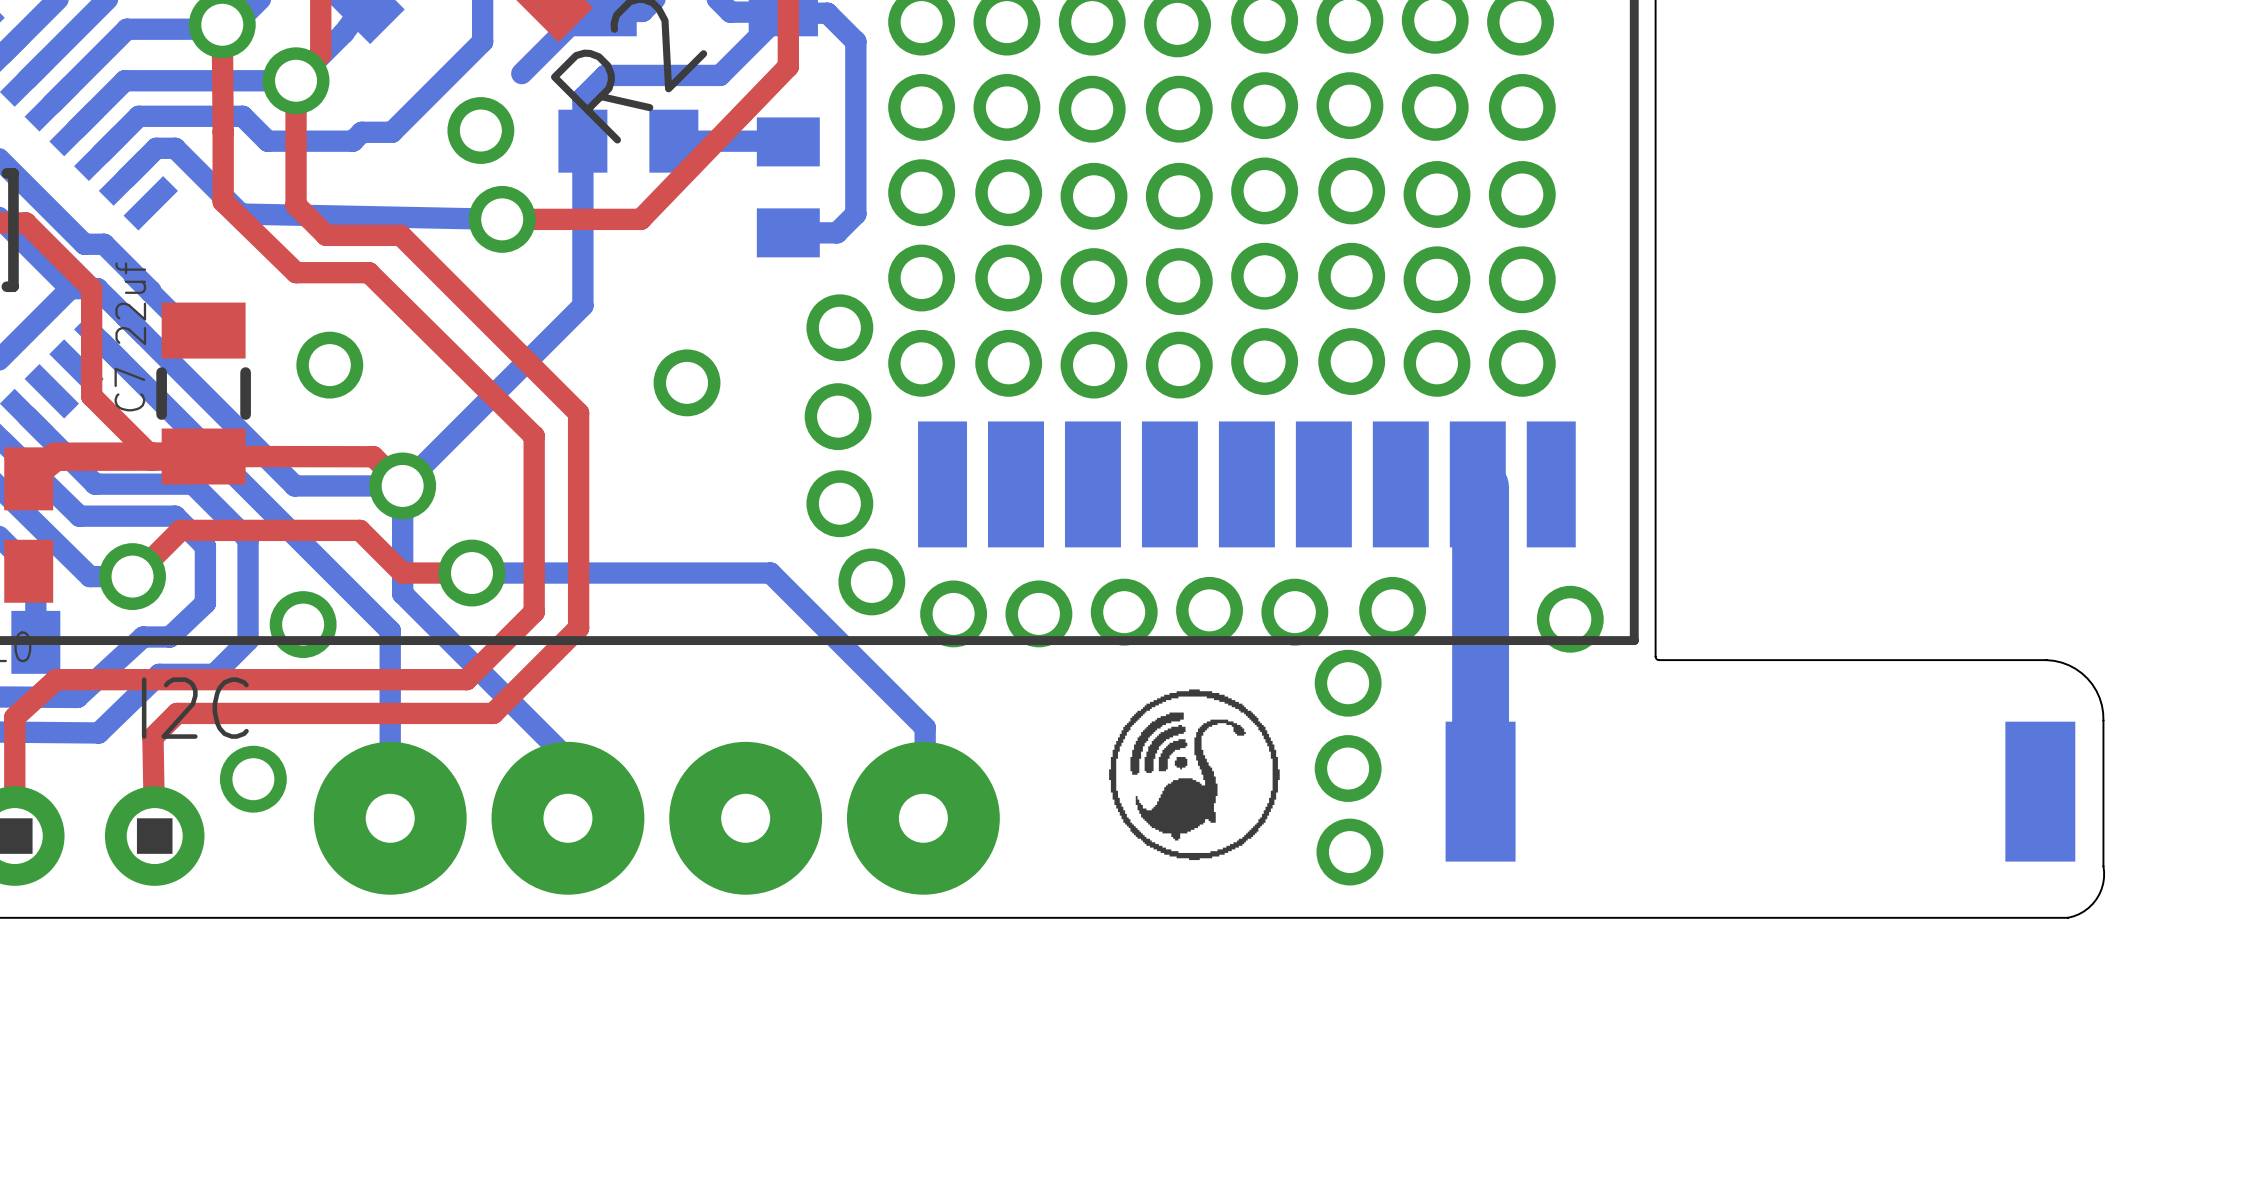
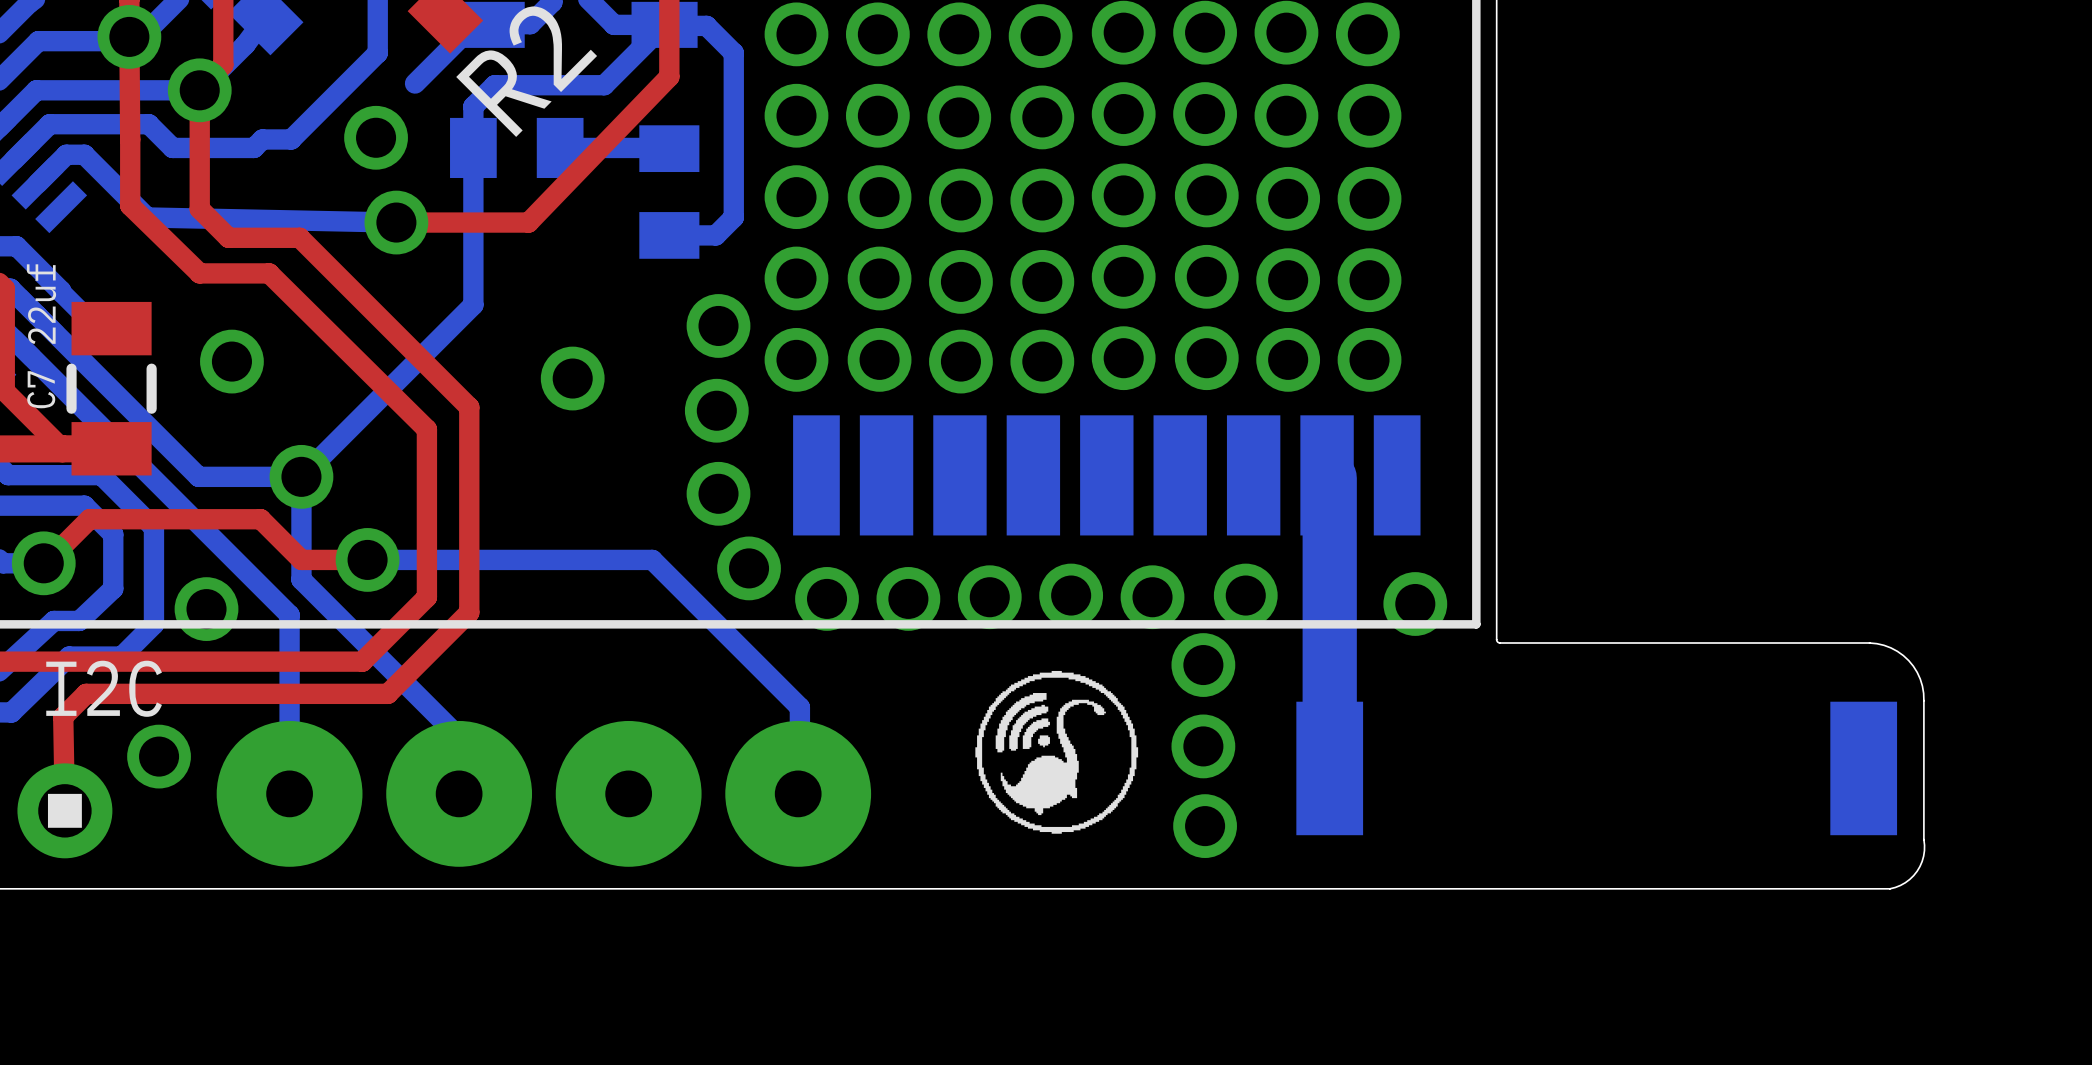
top track: (203, 456) (373, 456) (402, 485) -> none

